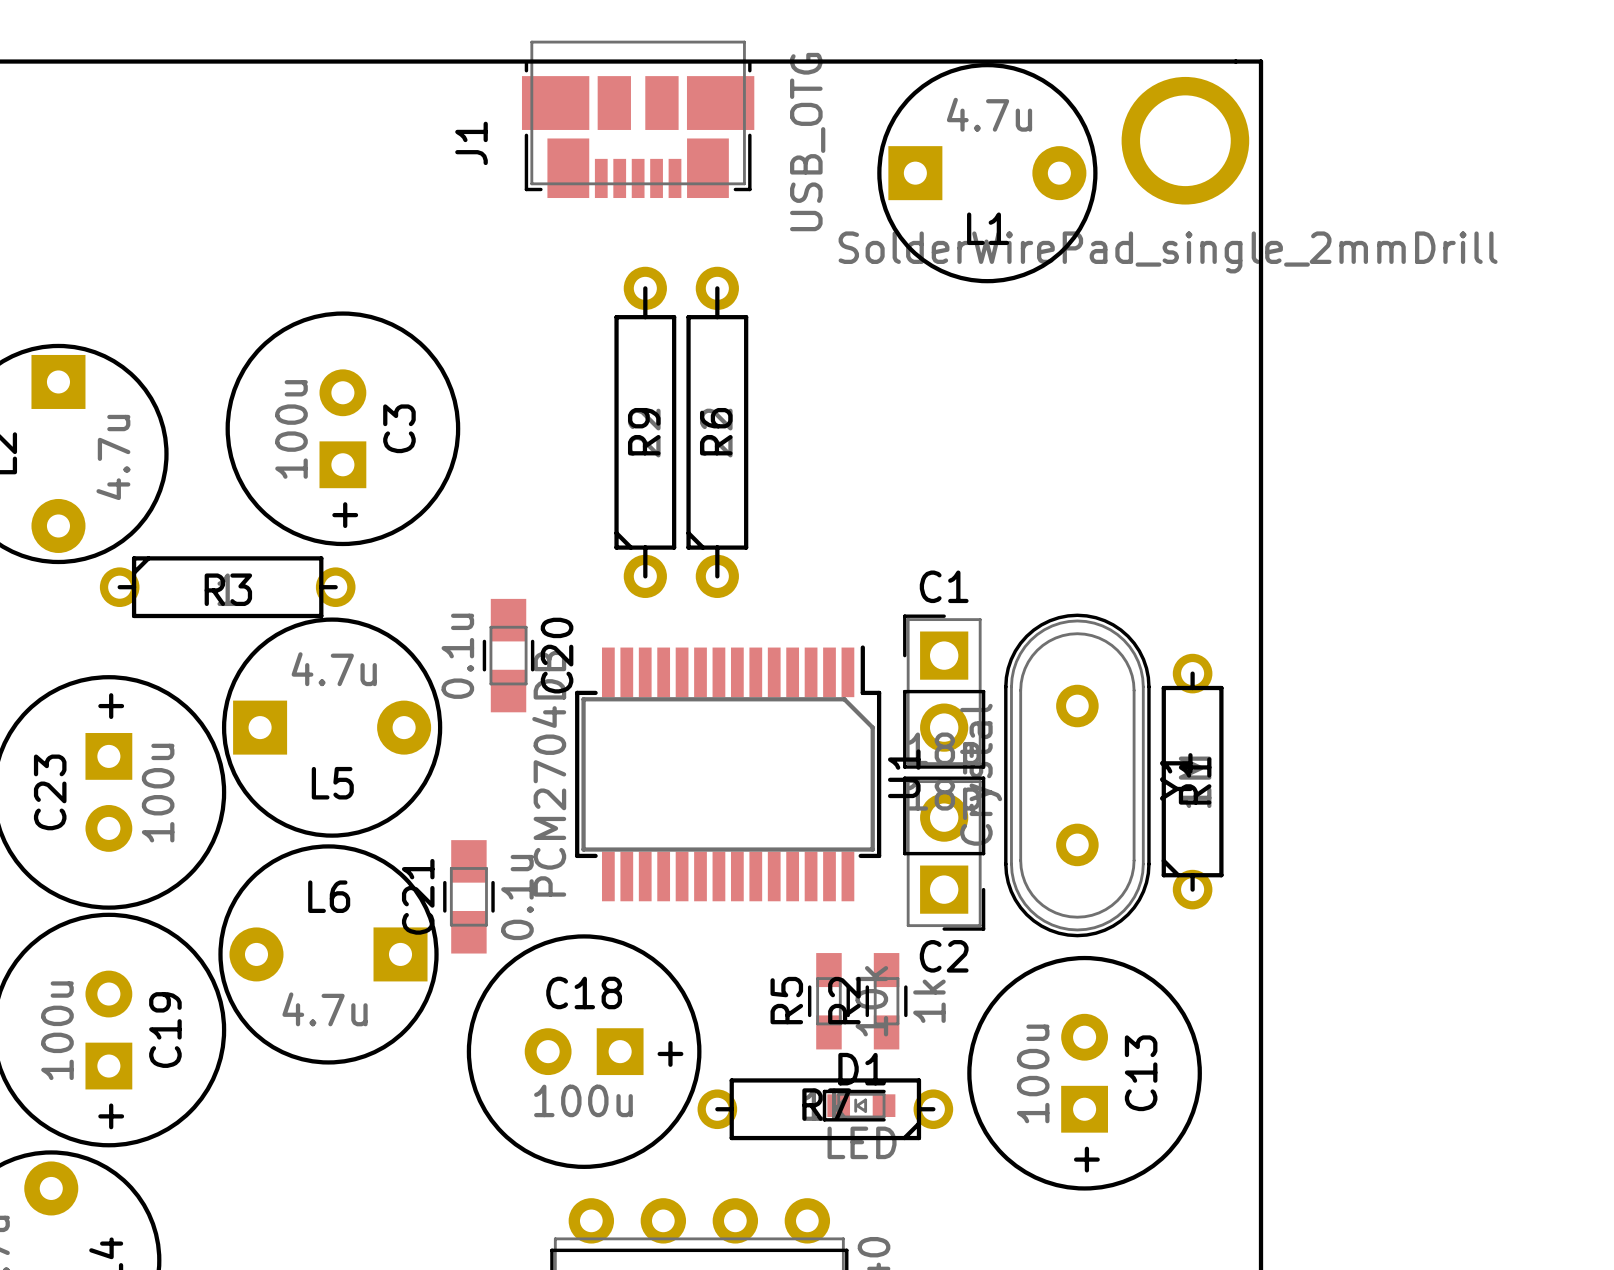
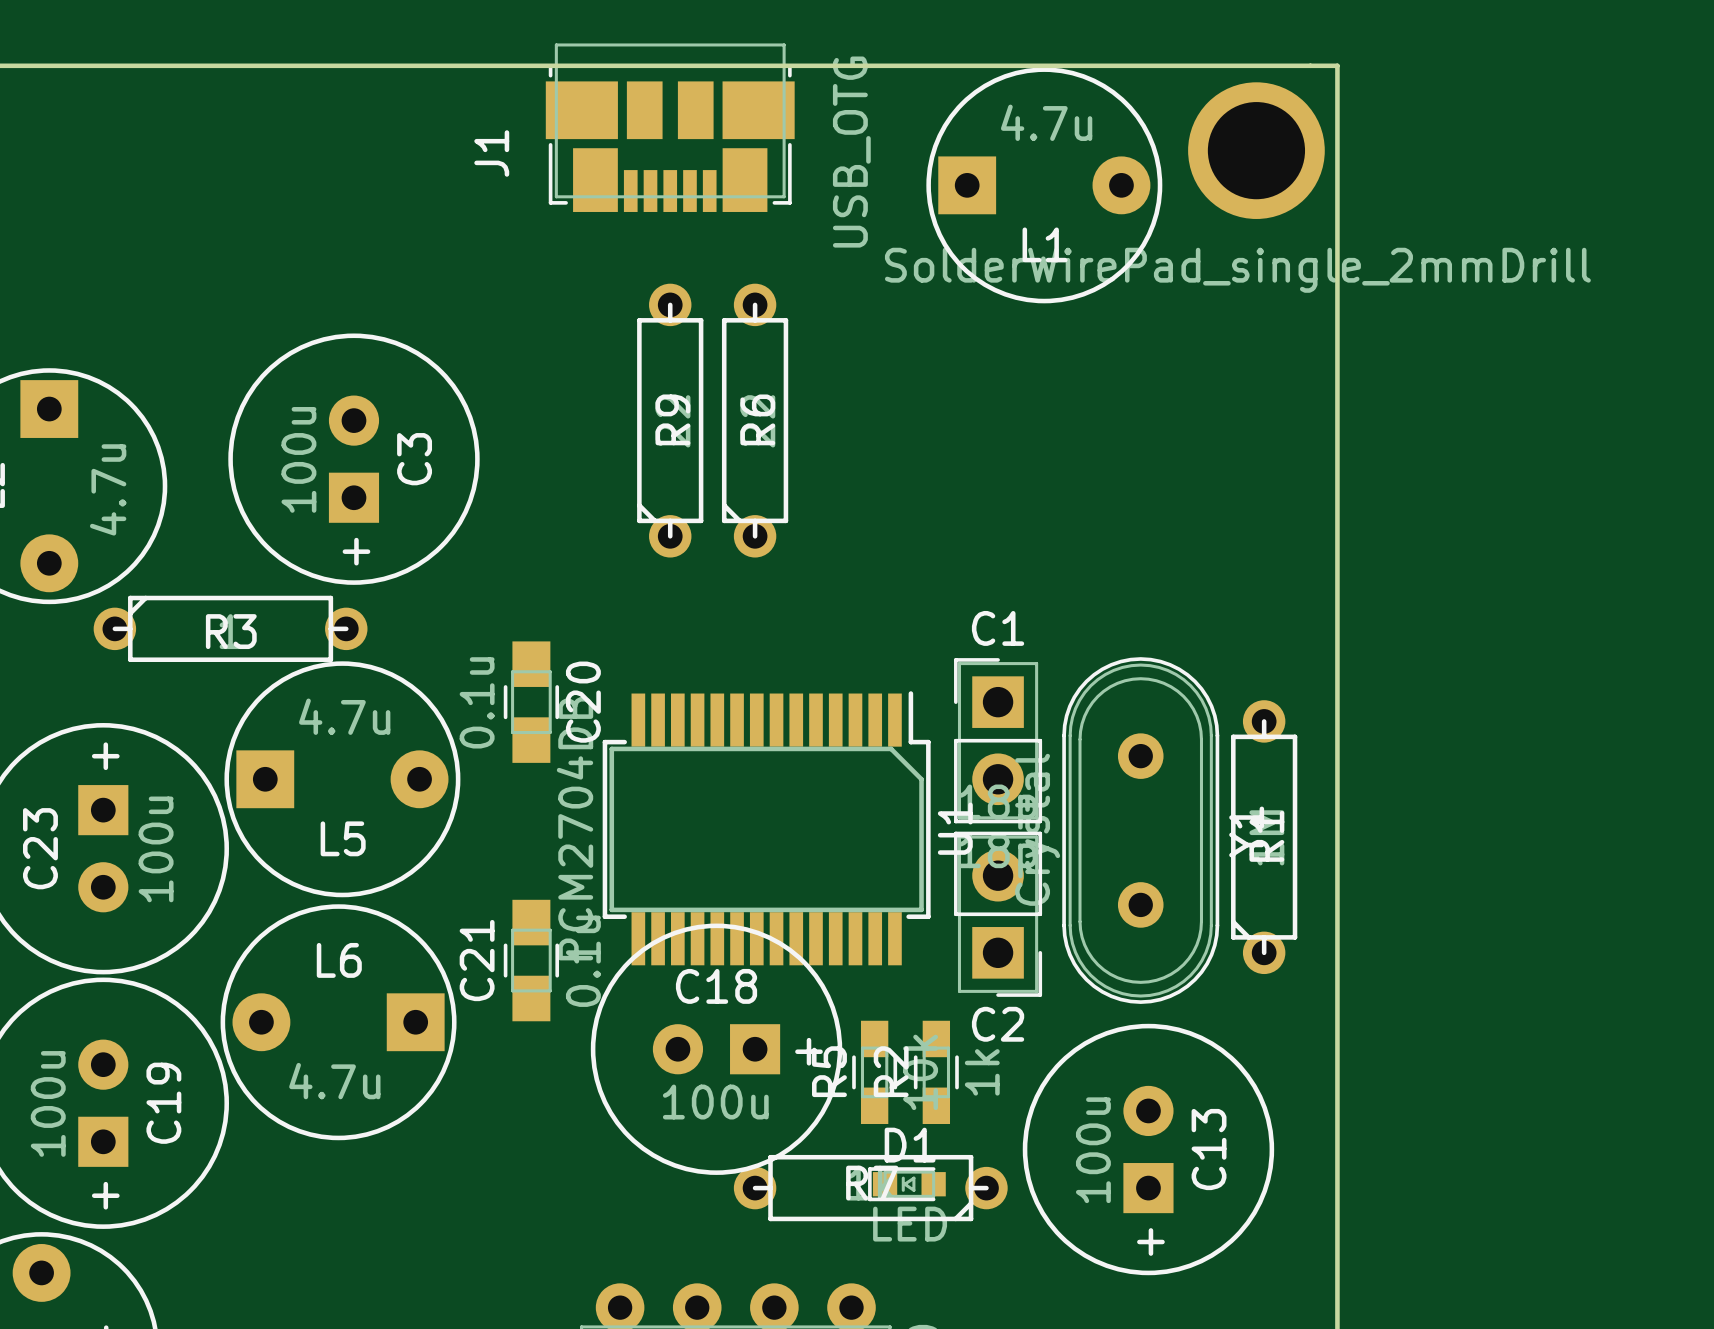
R9 footprint: [614, 266, 677, 598] -> [637, 283, 704, 558]
R6 footprint: [686, 266, 749, 598] -> [721, 283, 789, 558]
C21 position: (468, 896) -> (531, 960)
C18 position: (584, 1051) -> (716, 1049)

